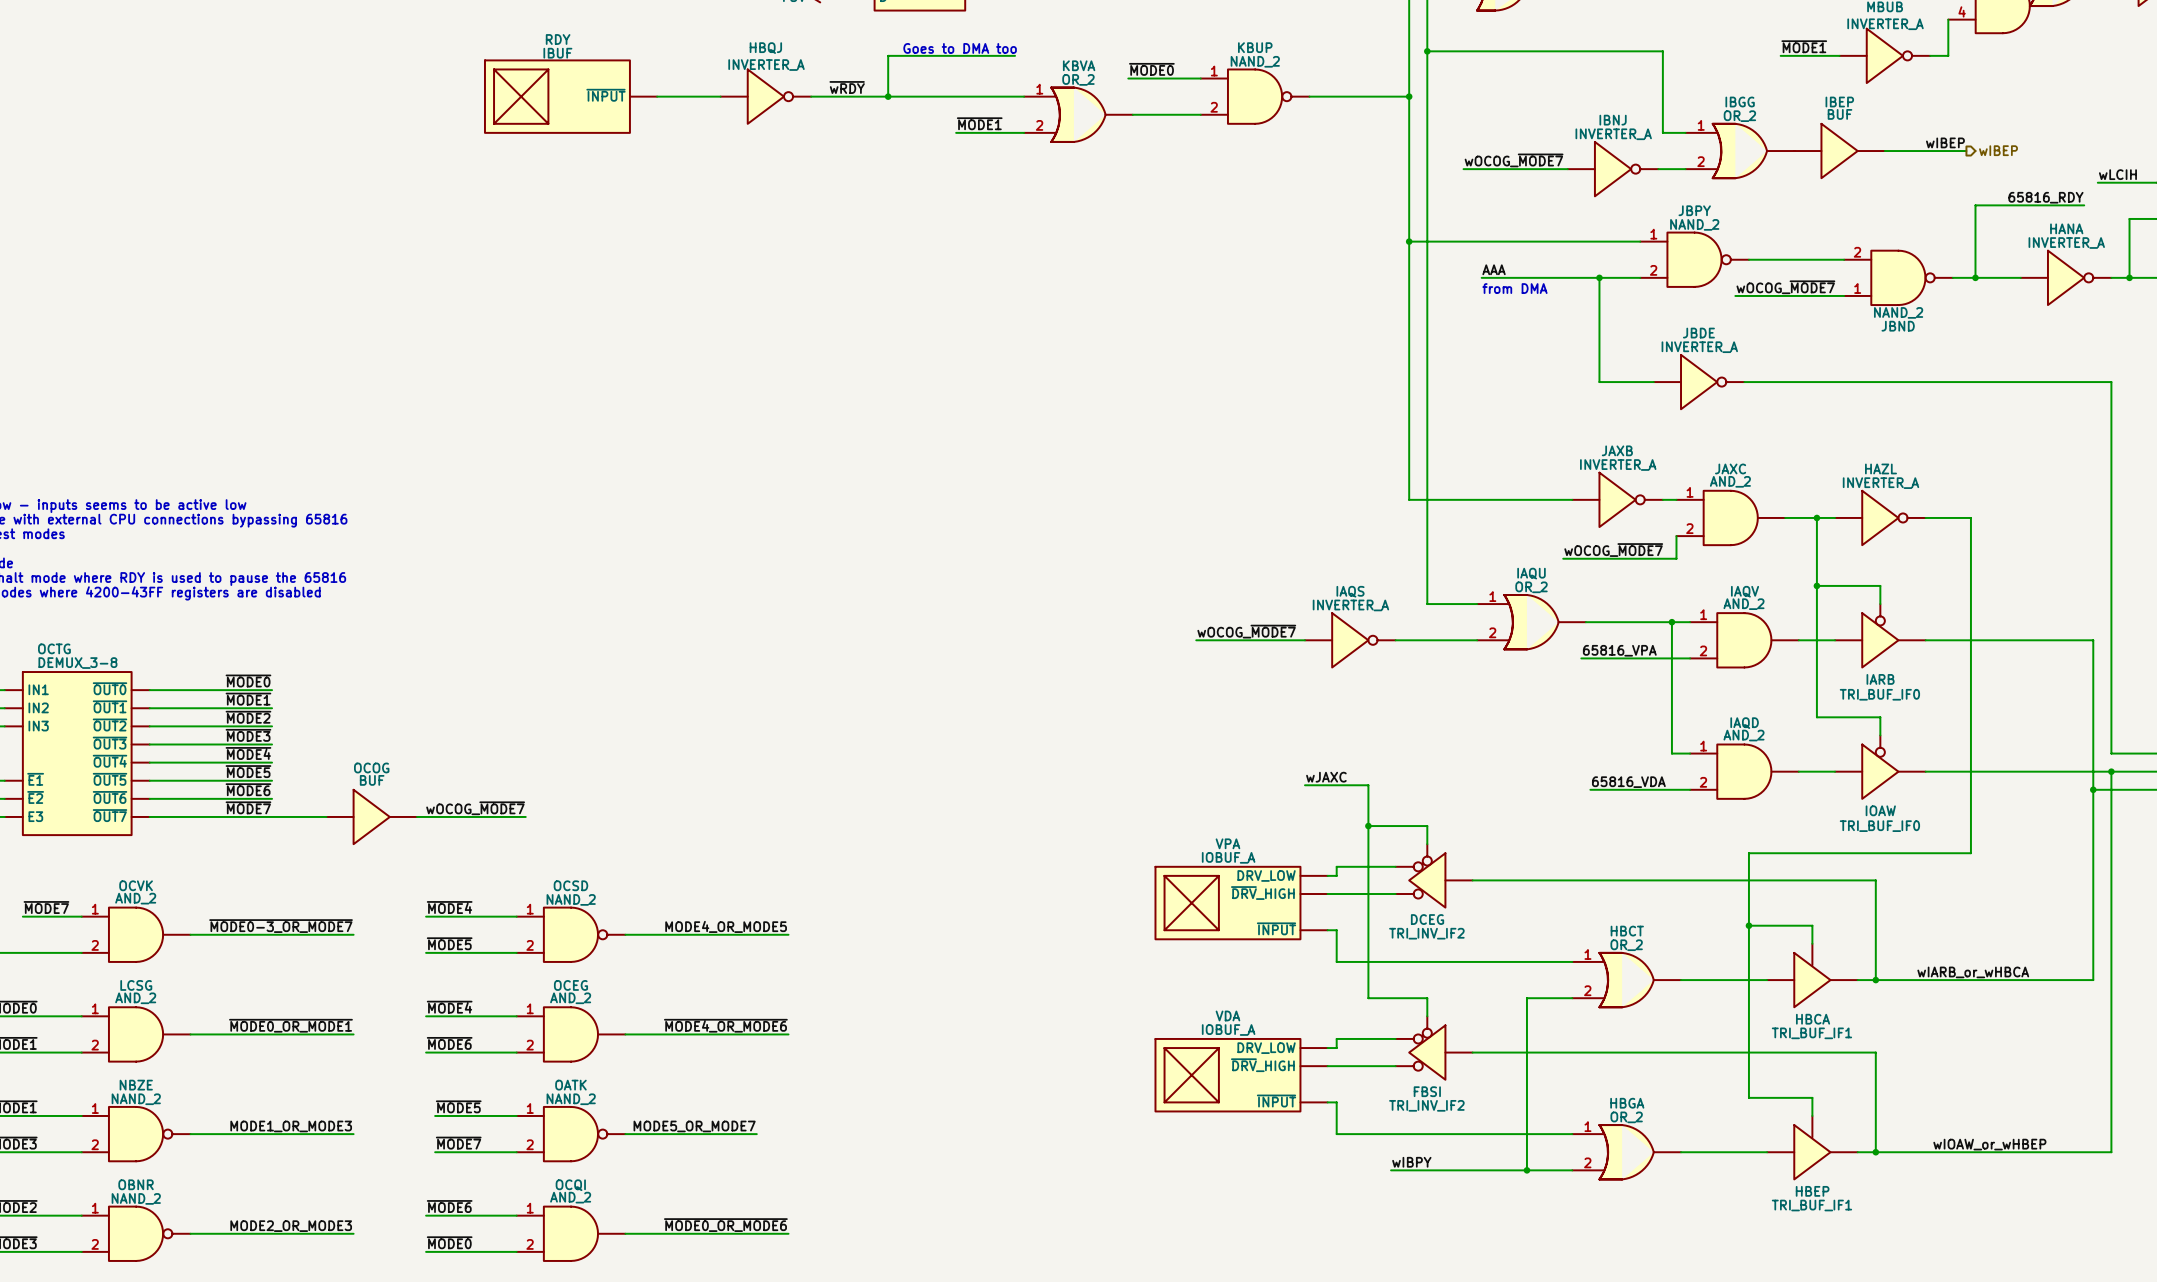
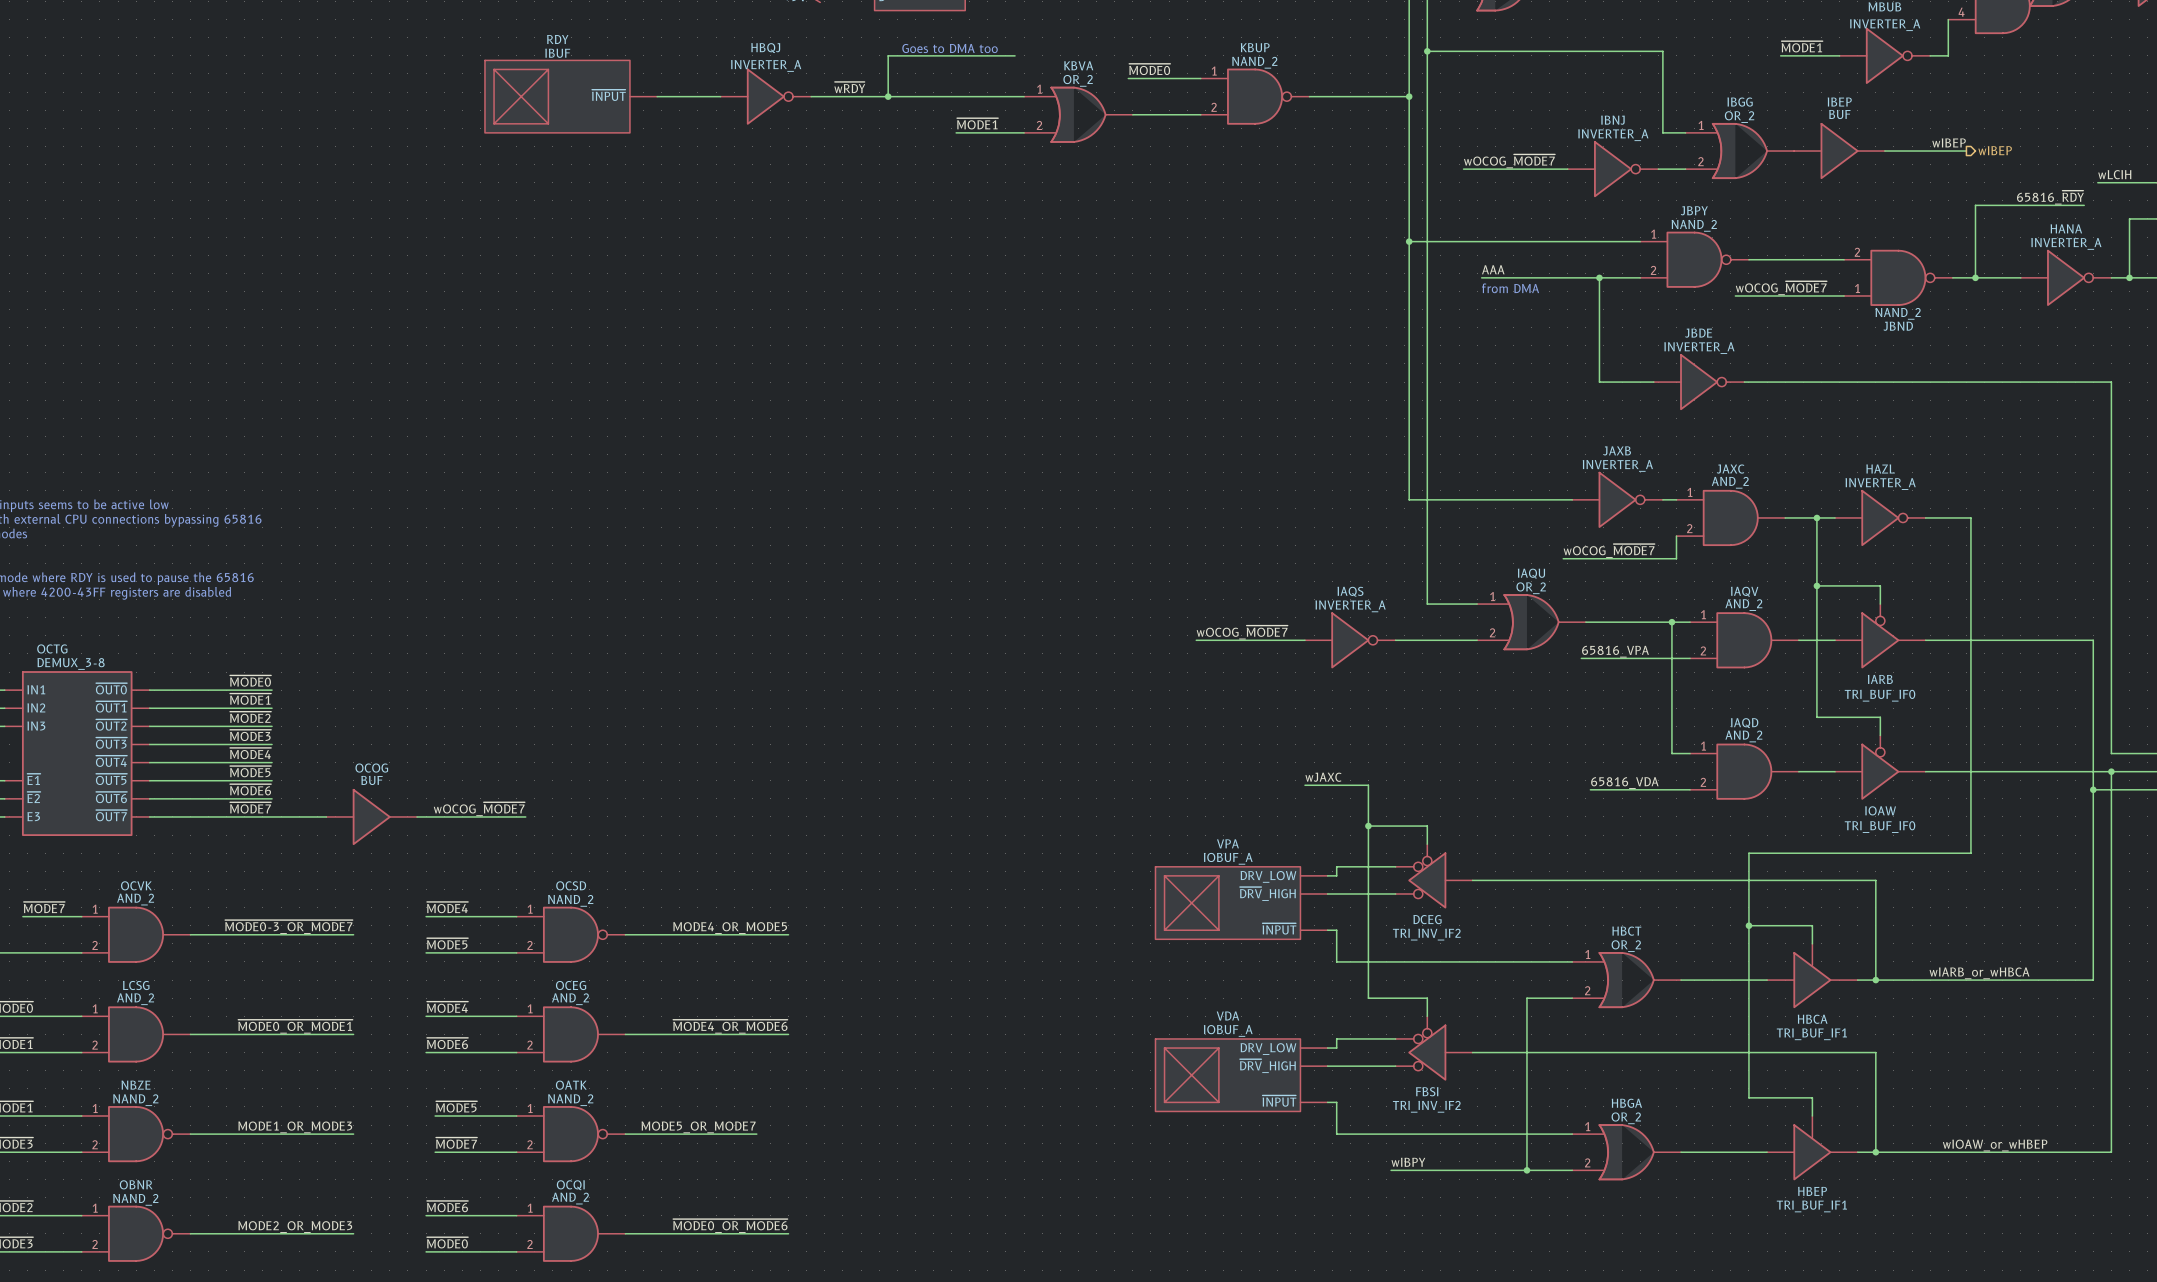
label: 65816_RDY (2045, 197) -> 65816_~{RDY} (2050, 197)

